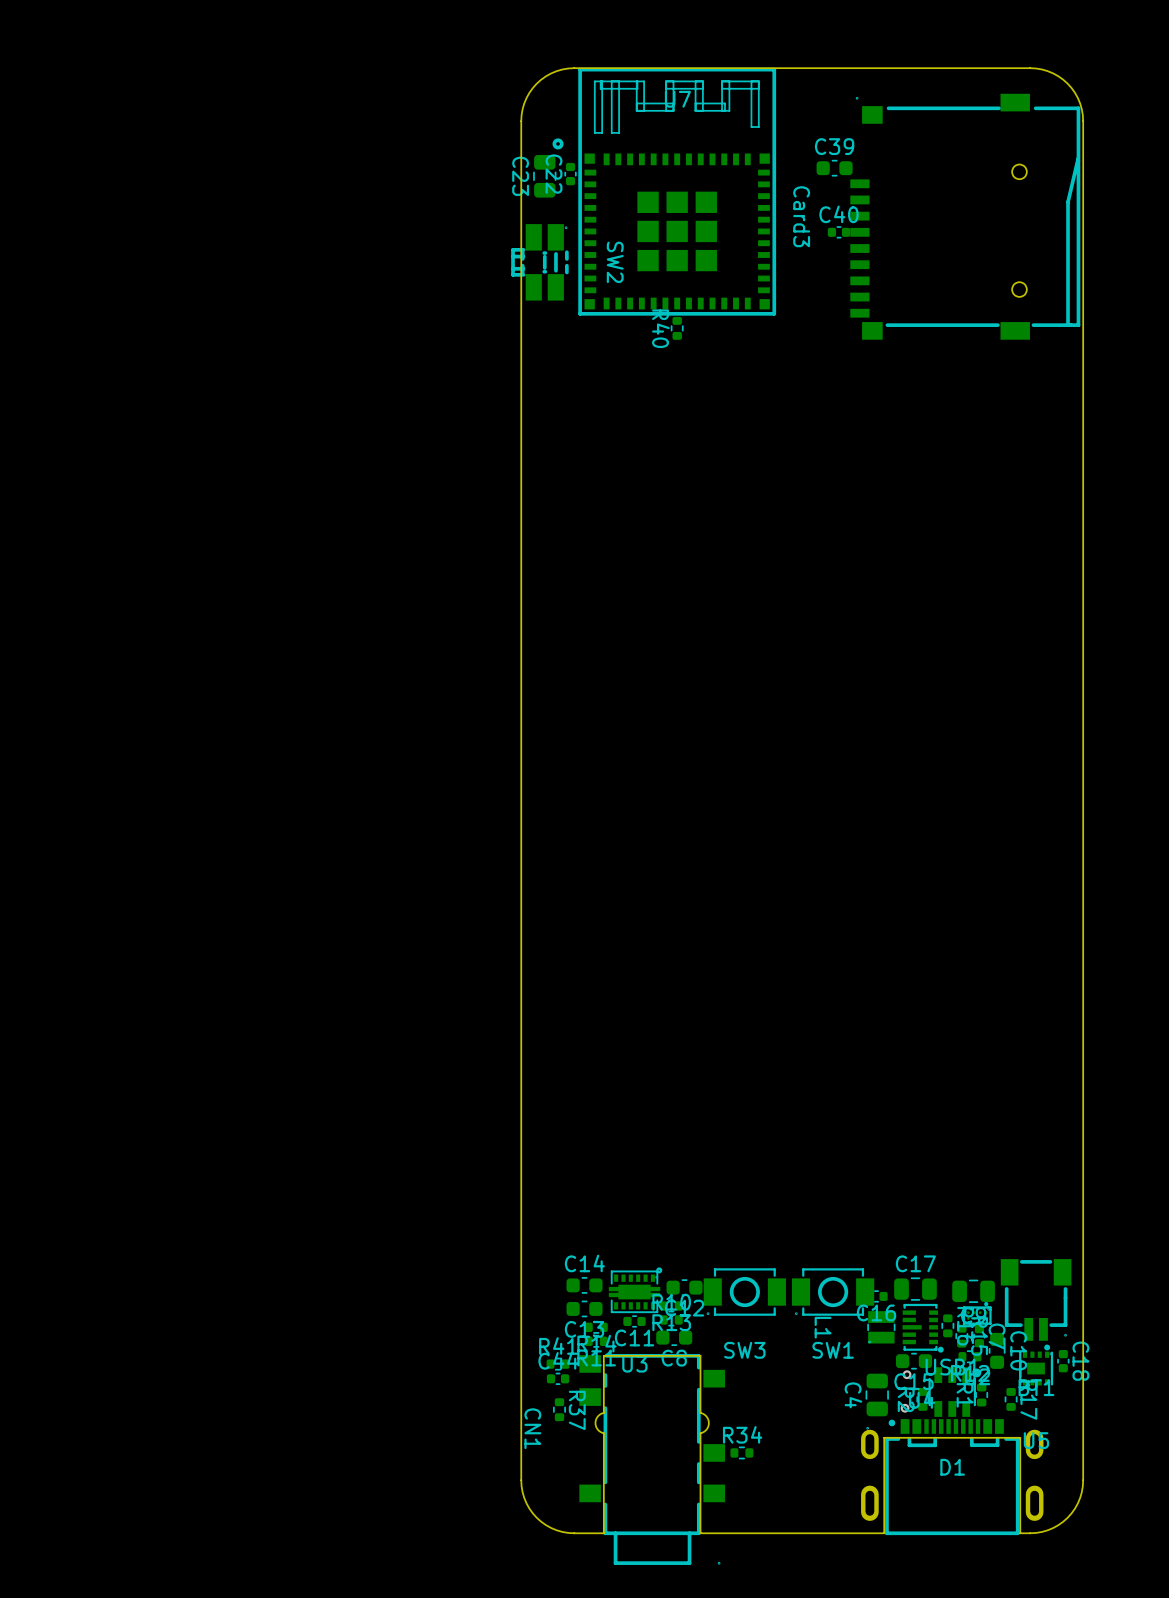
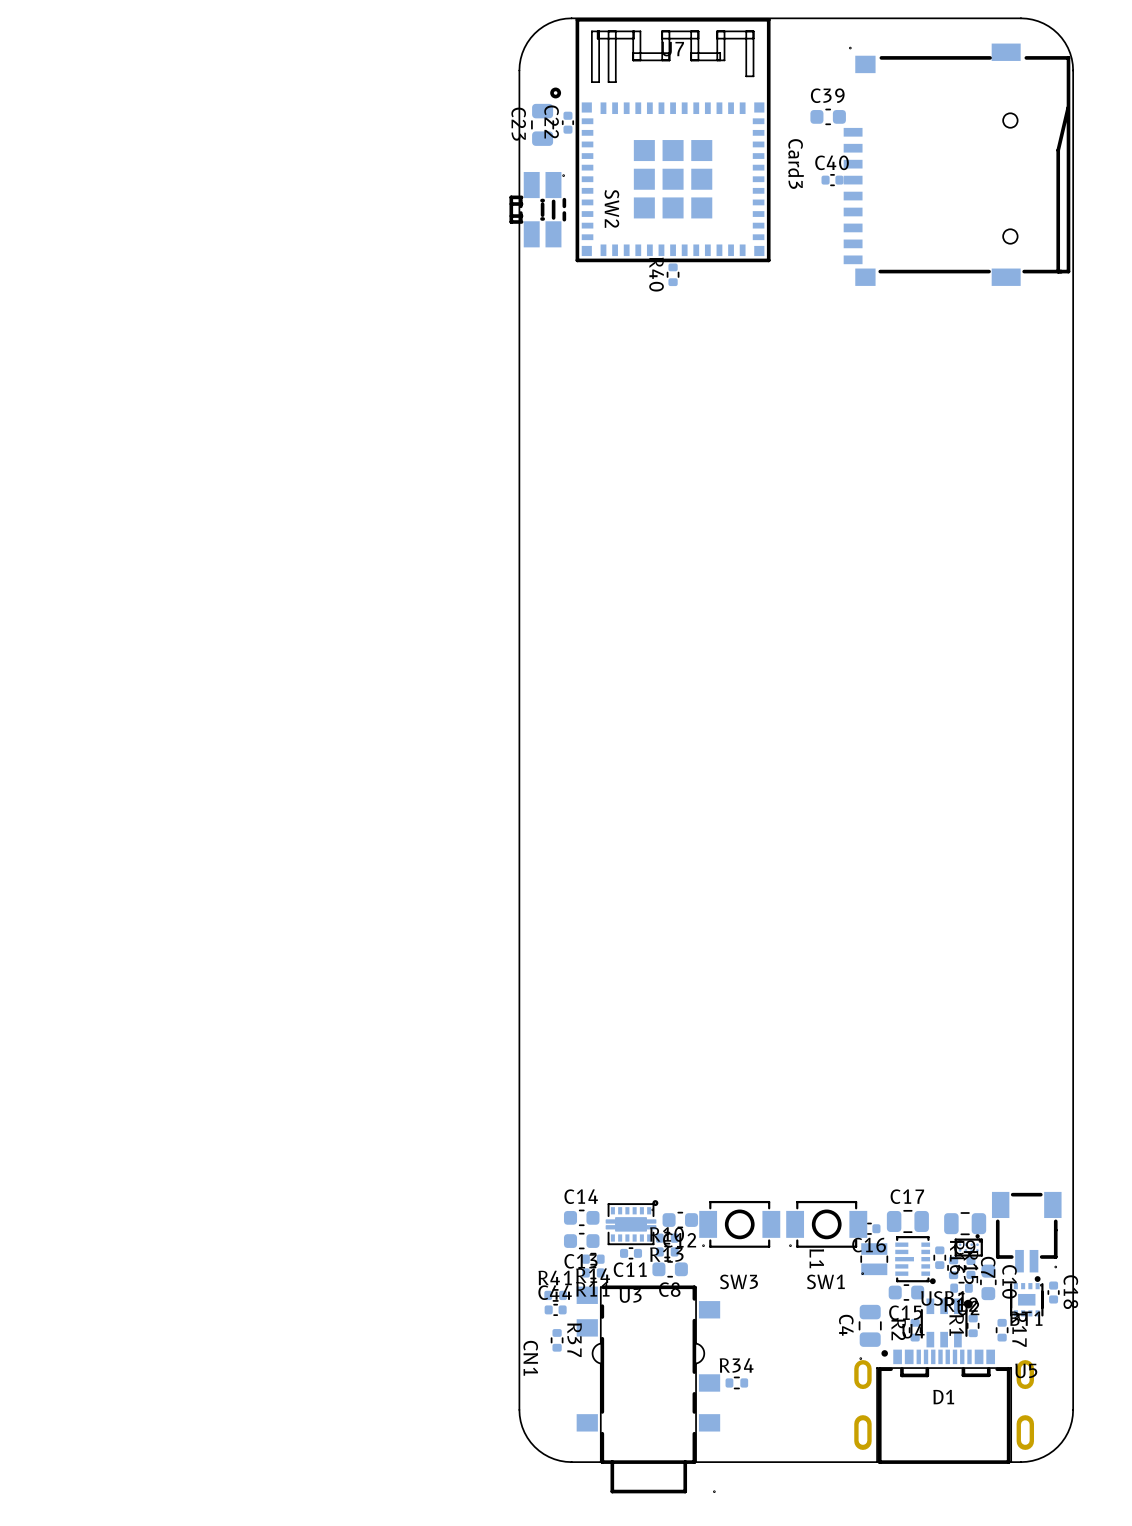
via: (907, 1374) -> none
via: (905, 1408) -> none

